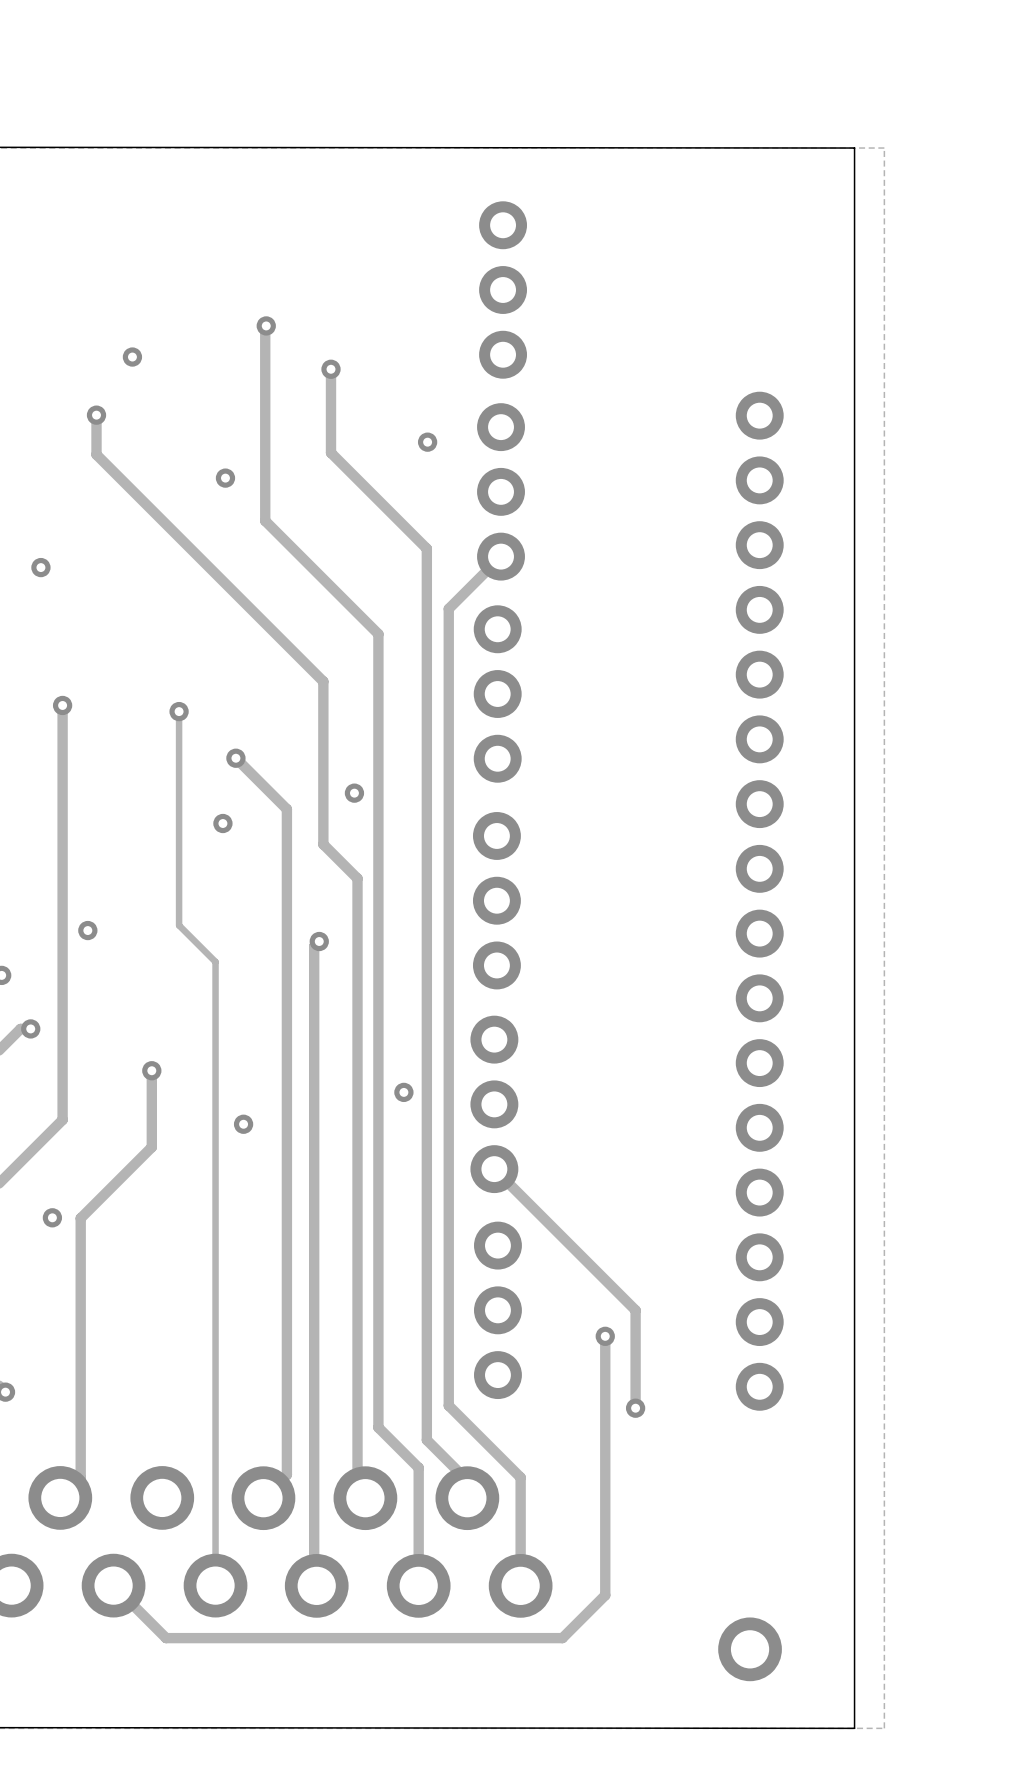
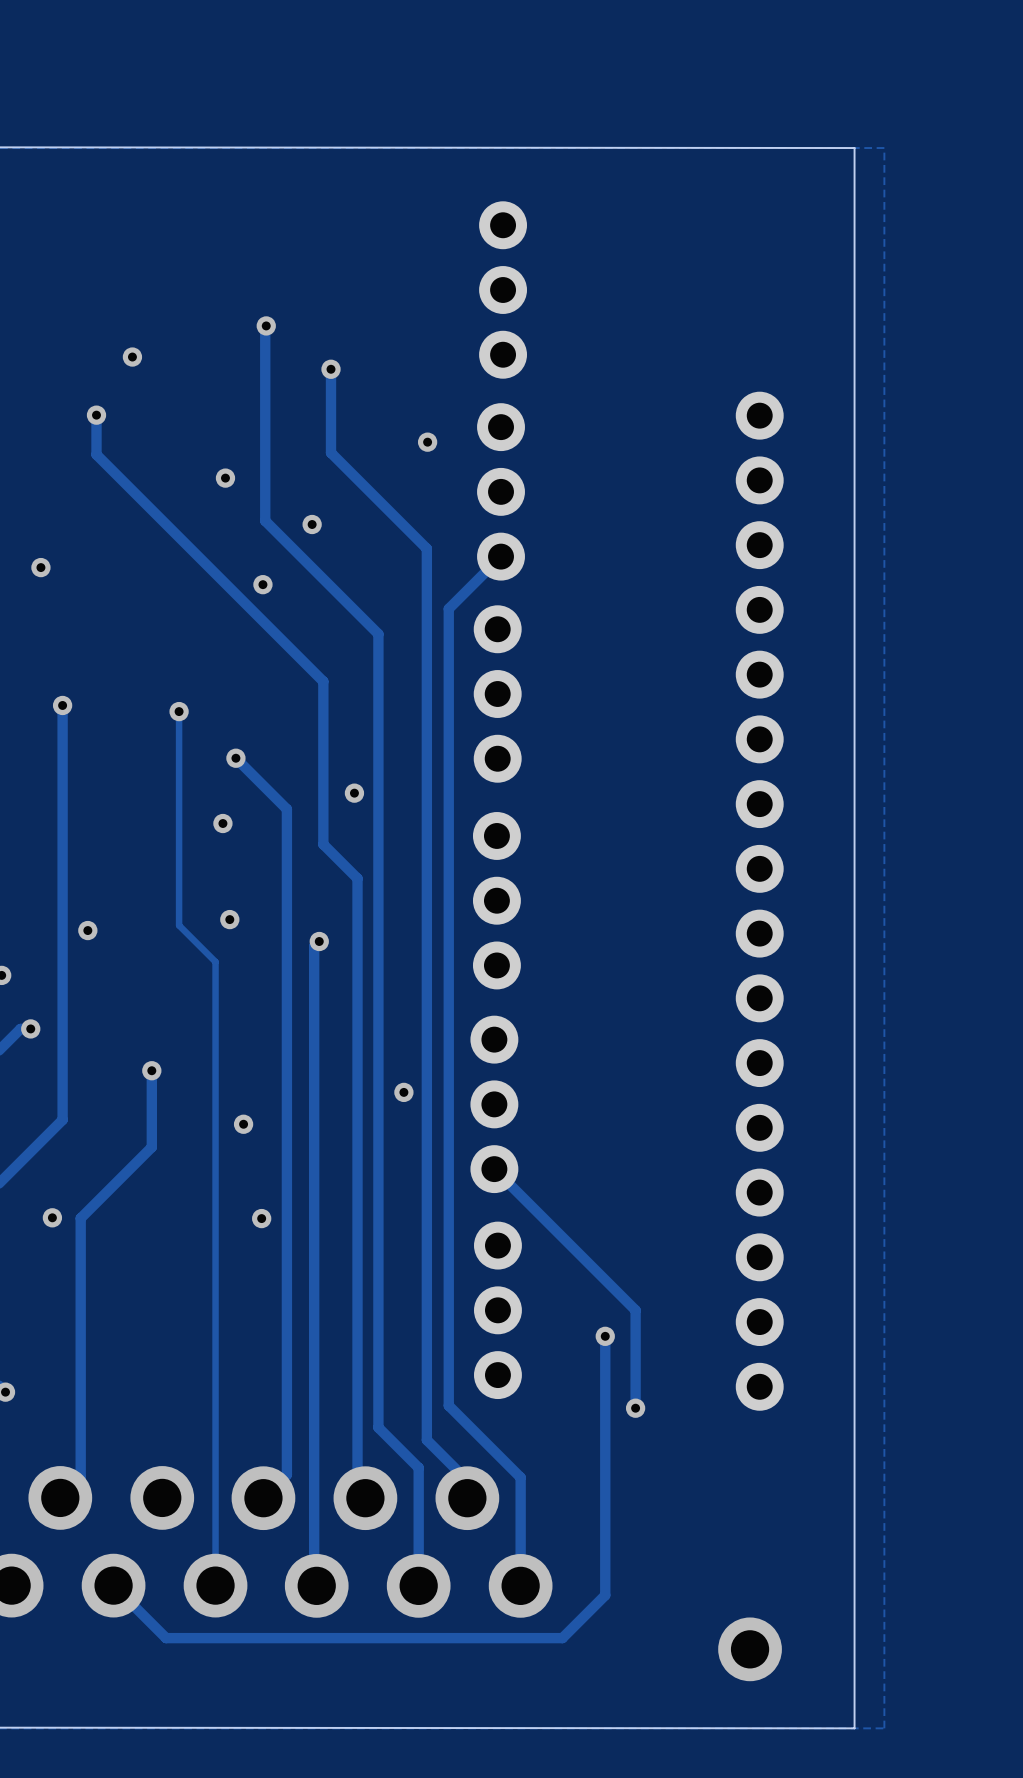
via: none -> (312, 524)
via: none -> (262, 584)
via: none -> (229, 919)
via: none -> (261, 1218)

